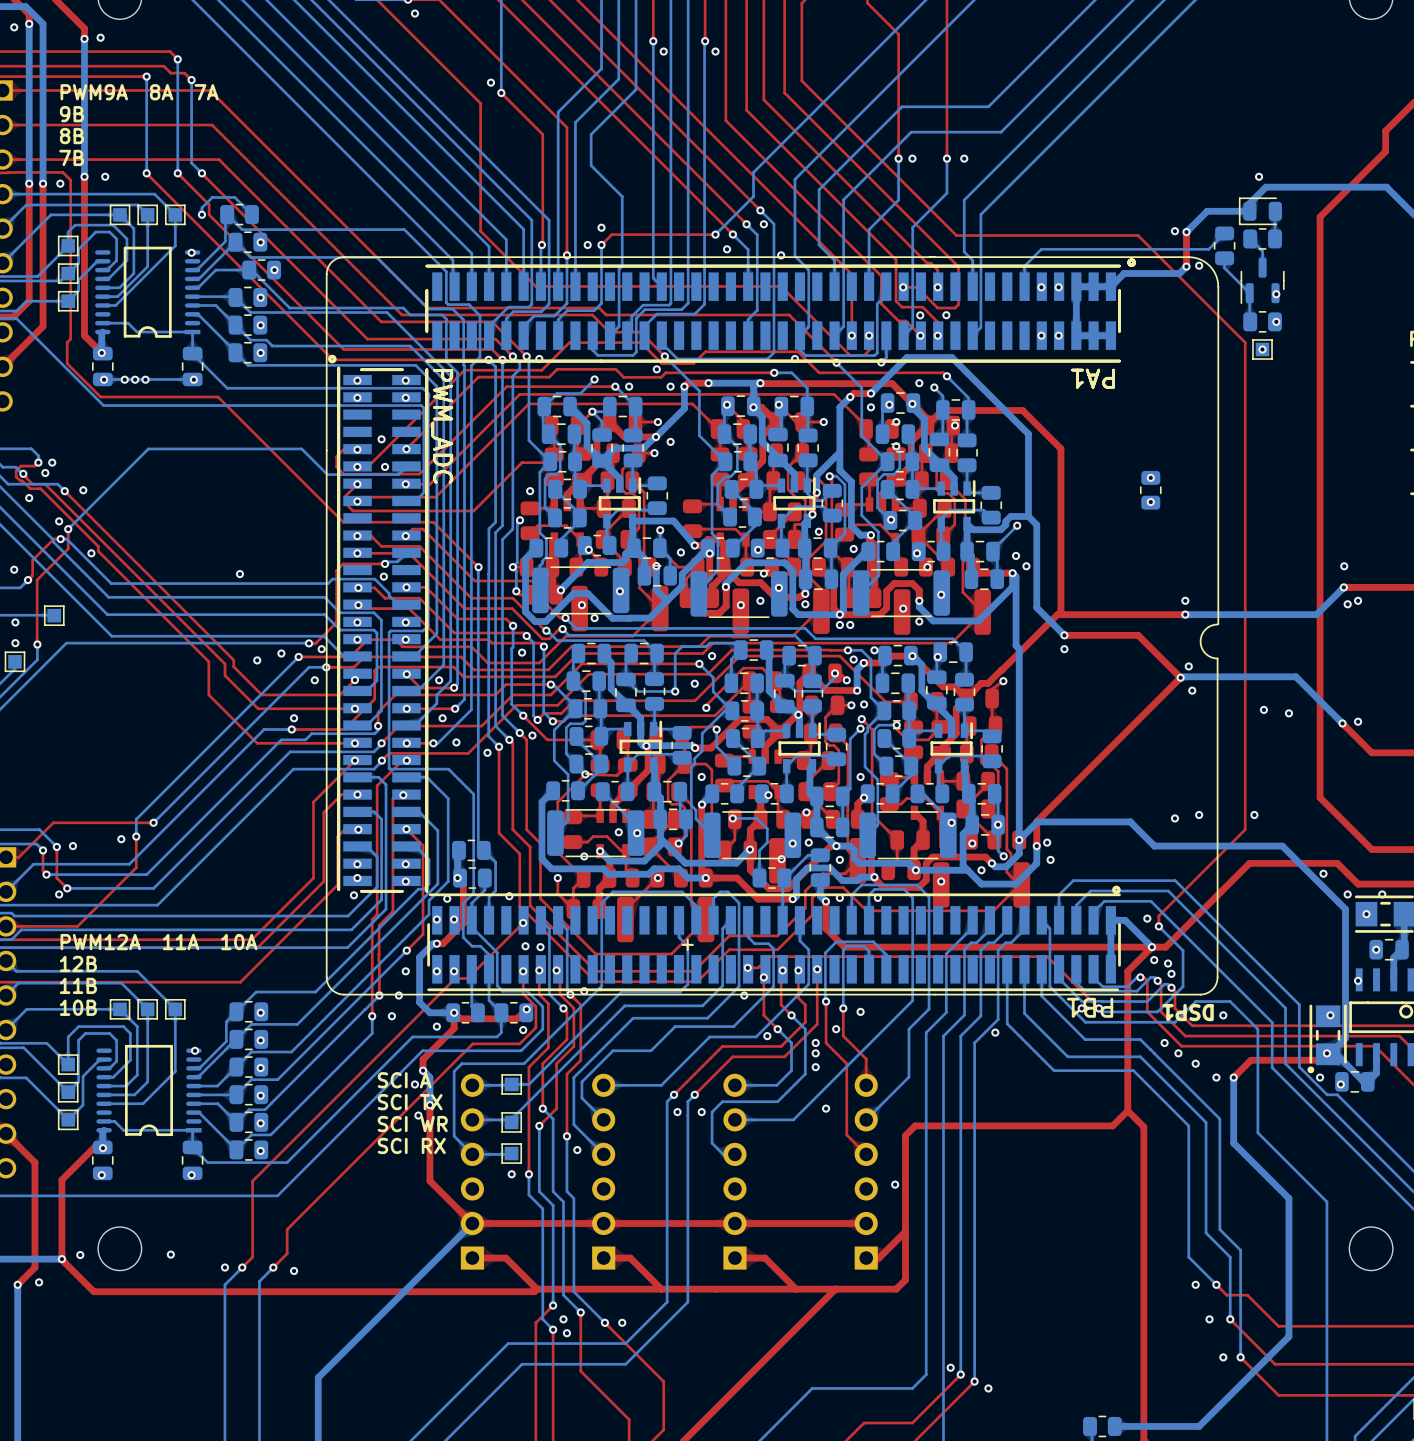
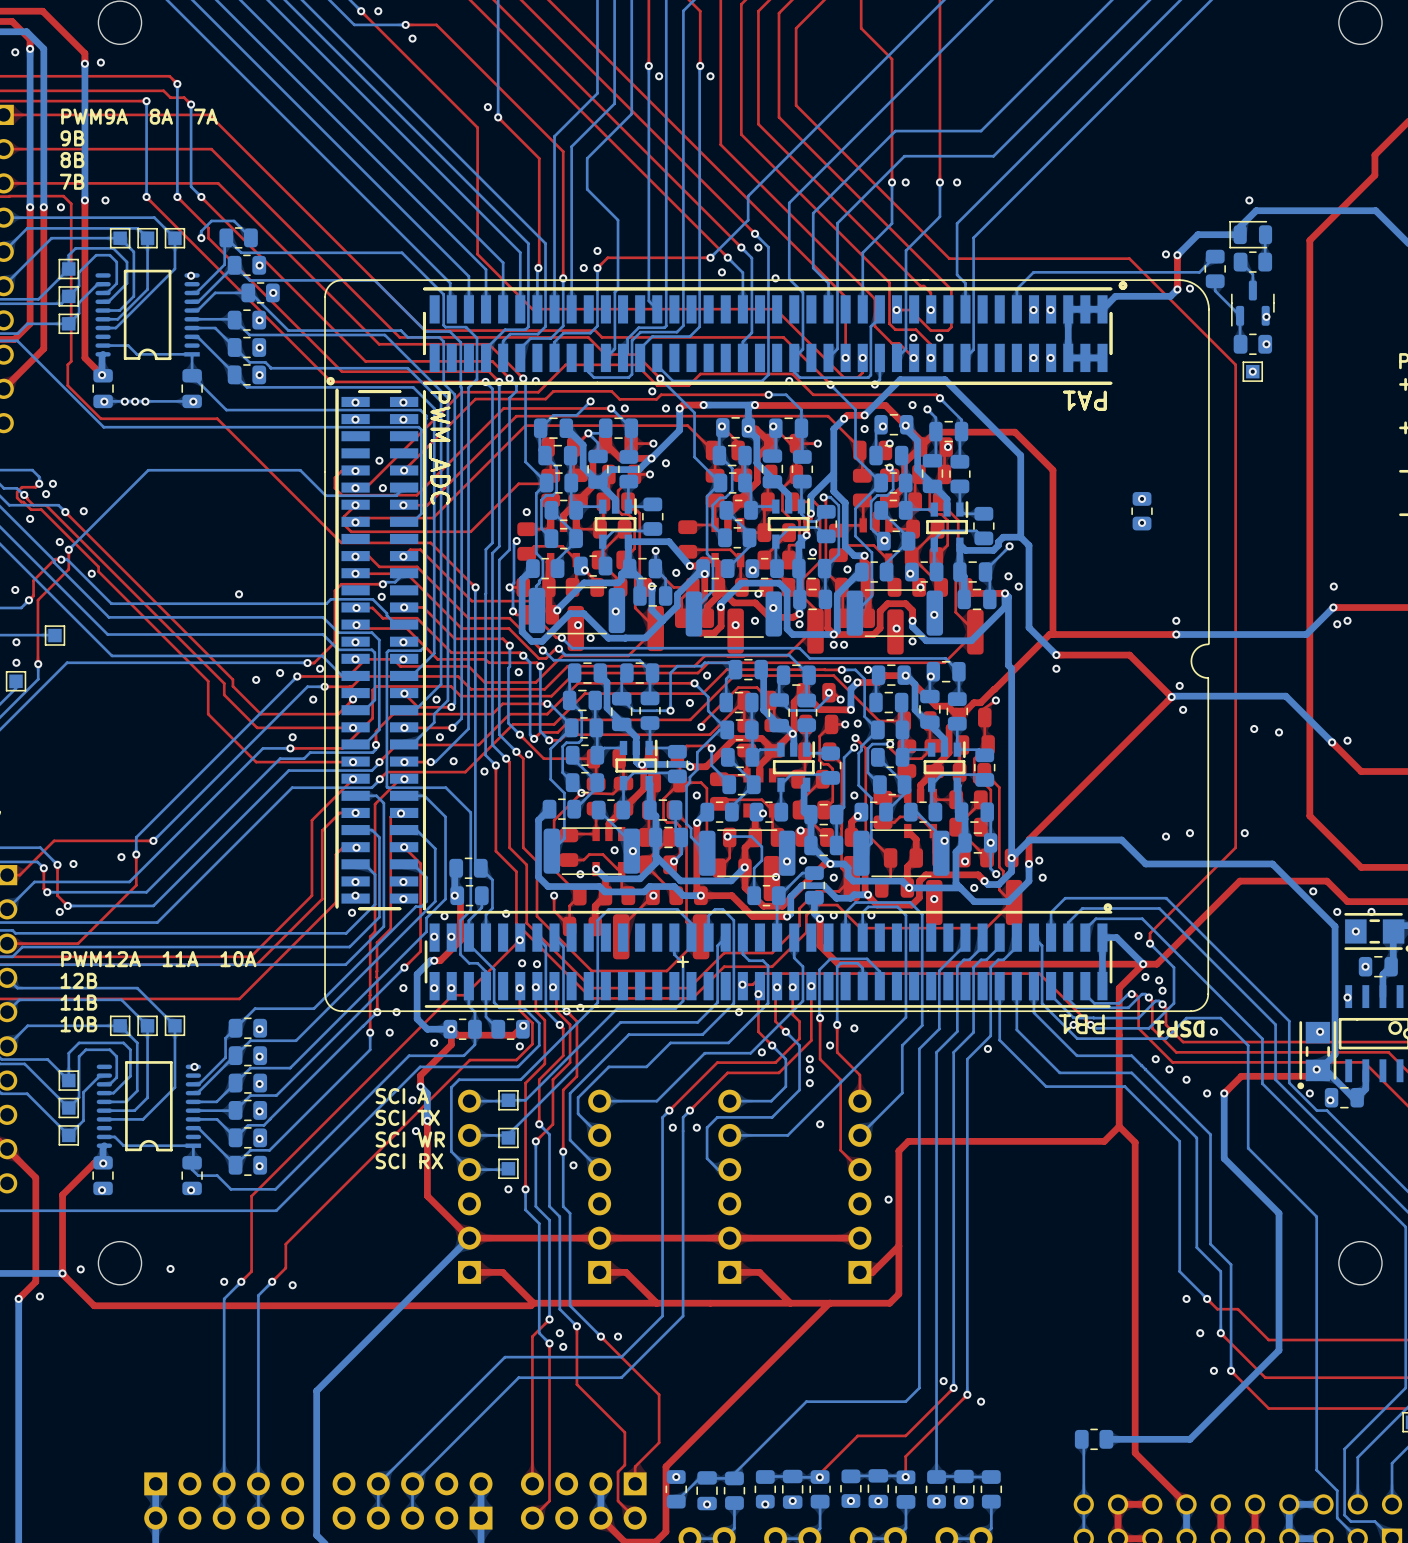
bottom track: (471, 989) (471, 1006) (477, 1012) -> none
bottom track: (501, 1012) (501, 1032) (497, 1036) (412, 1036) (287, 1162) (207, 1162) (192, 1147) (193, 1130) -> (468, 1005) (474, 1012) (474, 1044) (463, 1055) (409, 1055) (275, 1189) (231, 1189) (217, 1175) (198, 1175) (192, 1169) (193, 1145)

